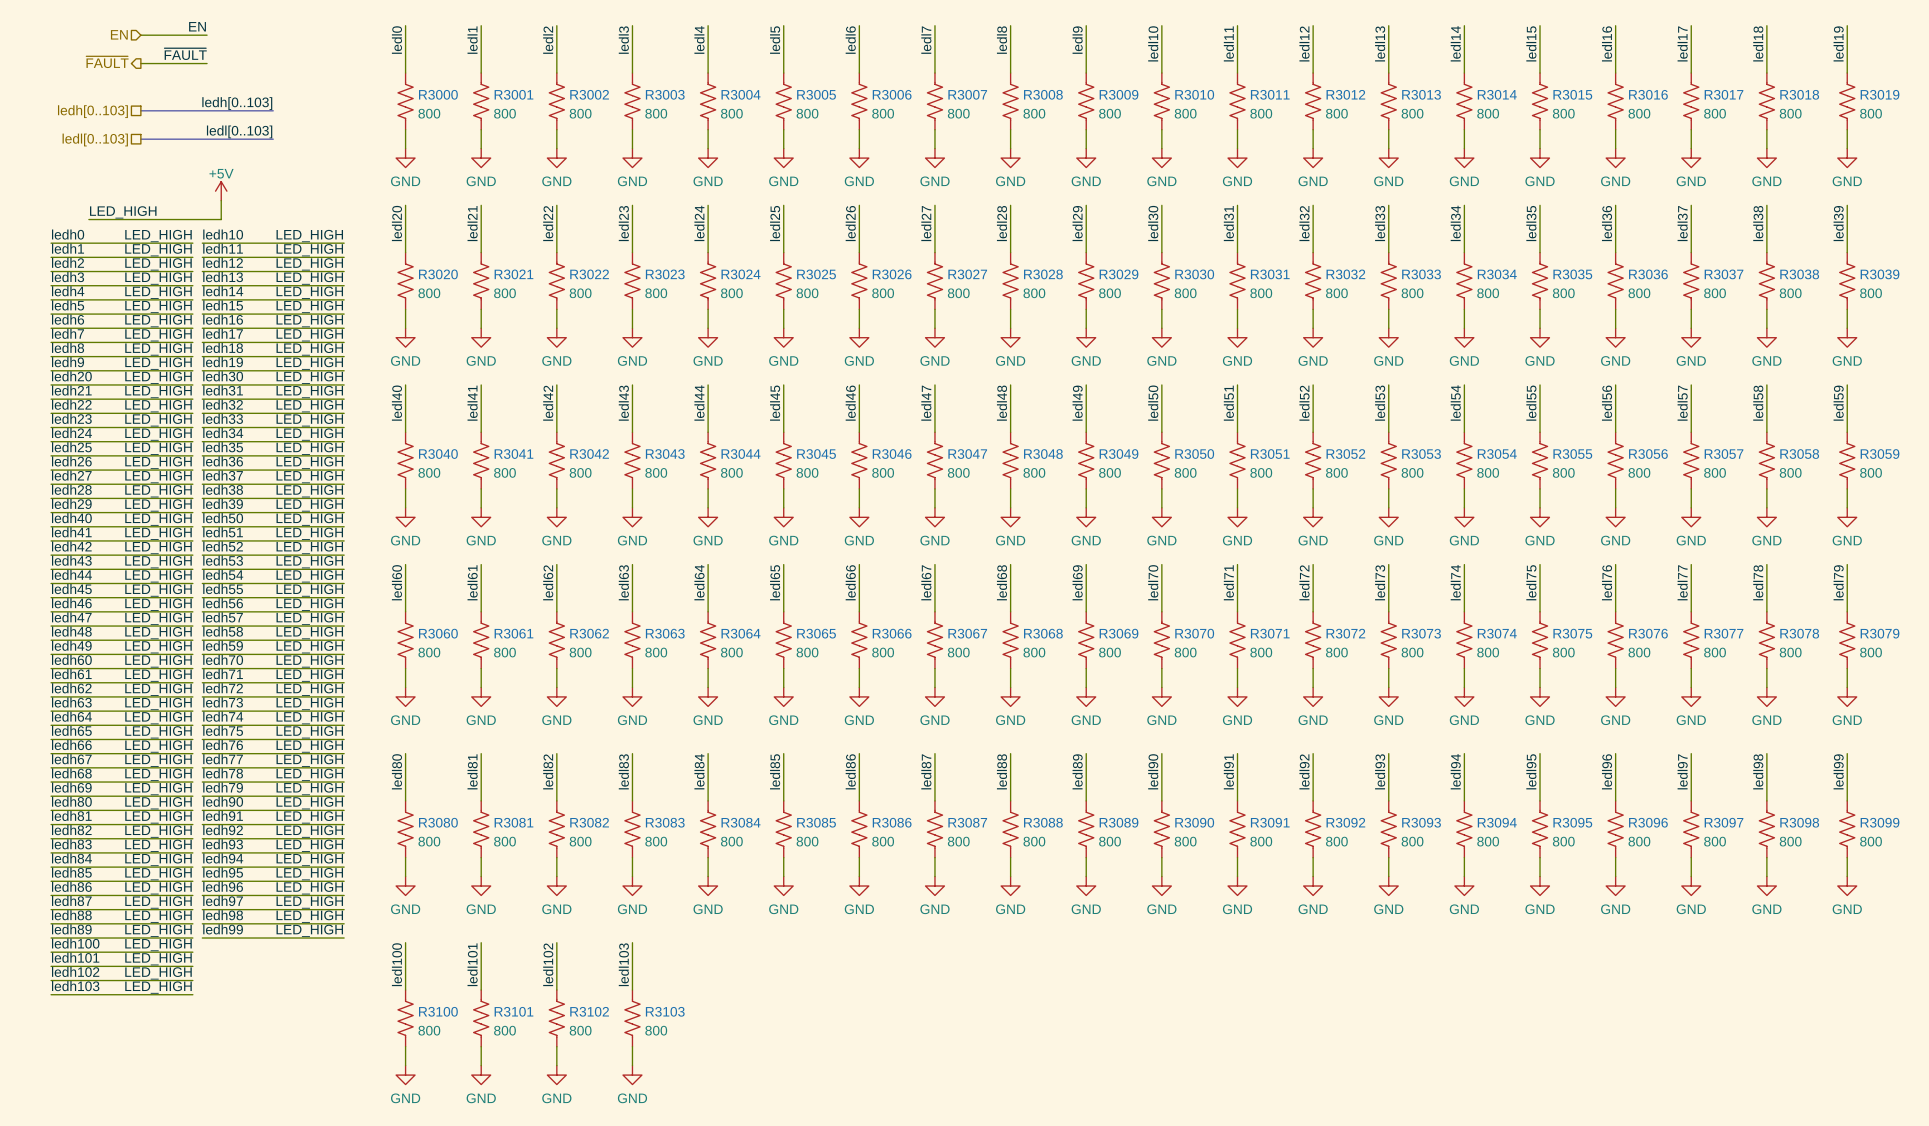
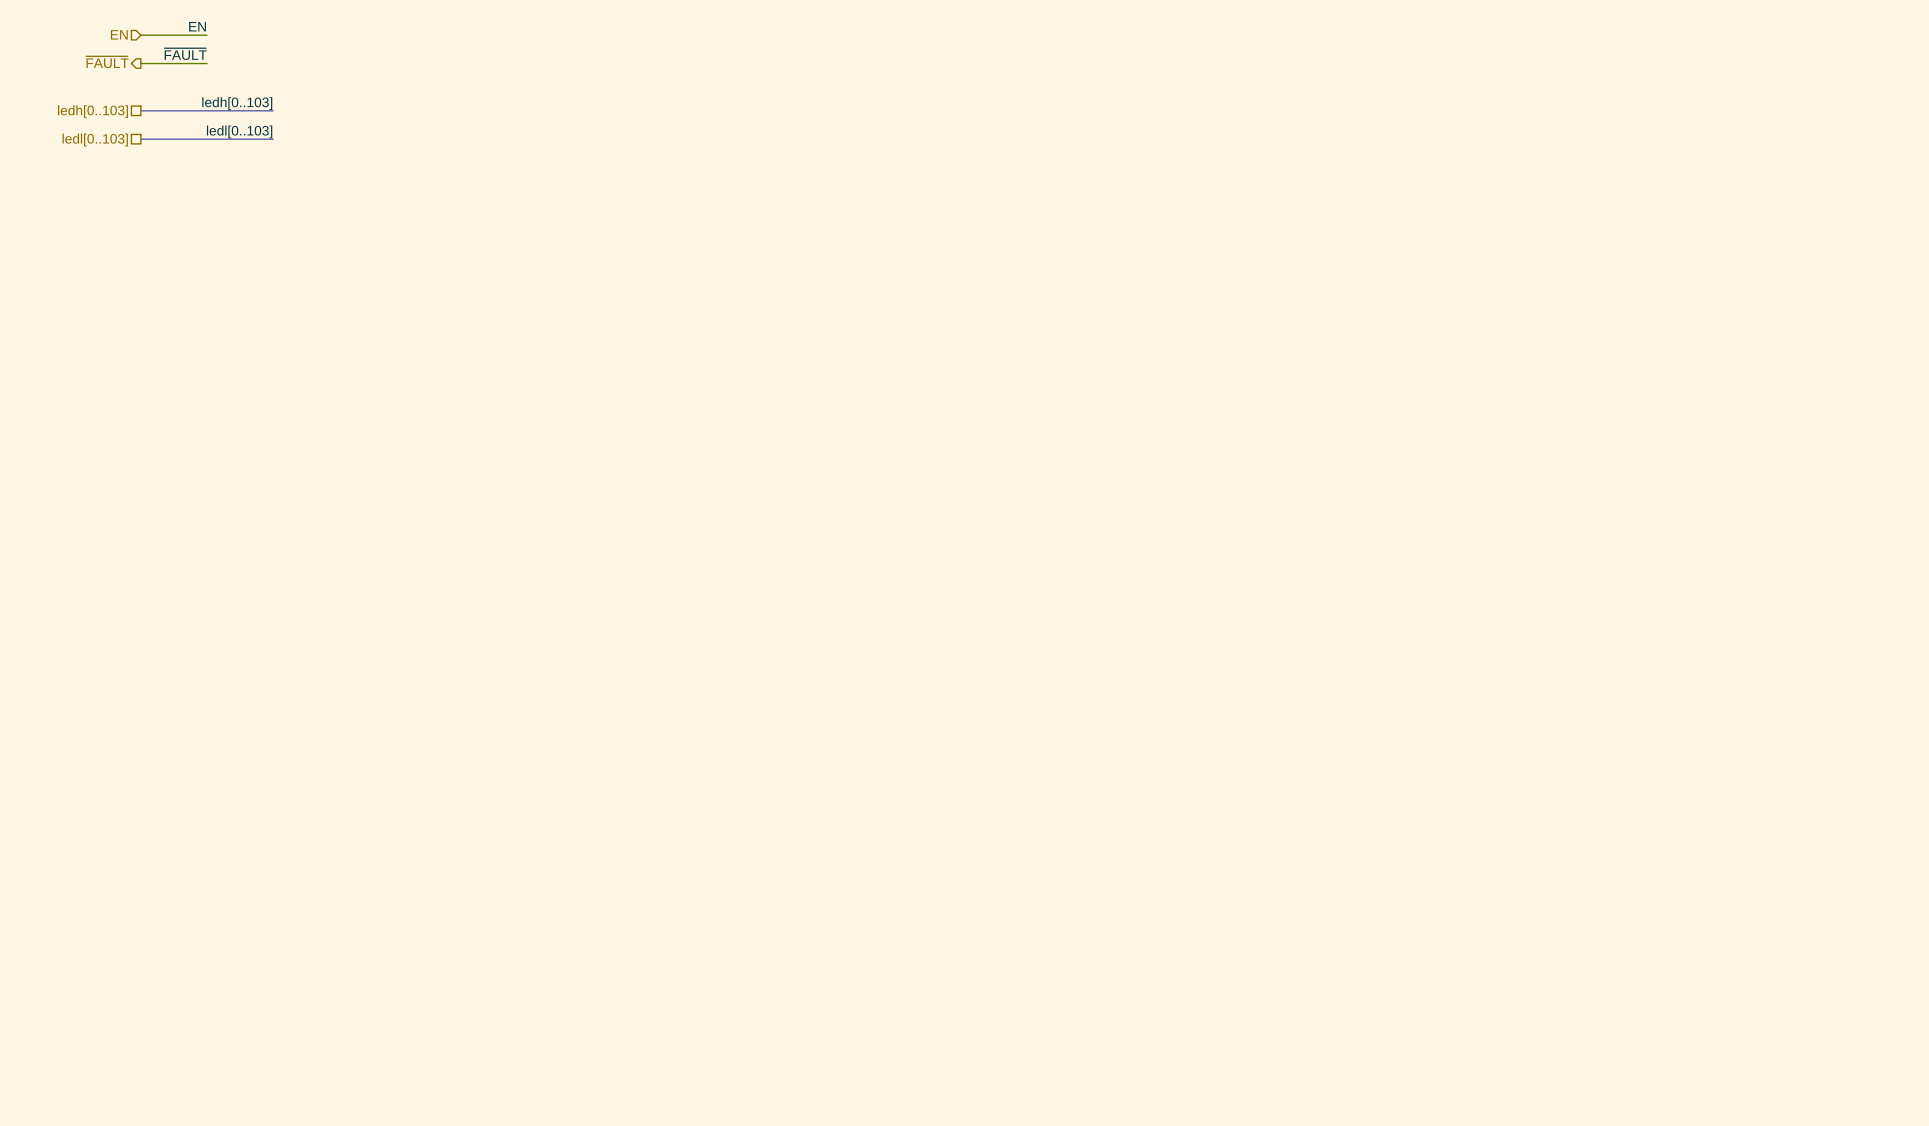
wire: (405, 25) (405, 73) -> none
wire: (481, 25) (481, 73) -> none
wire: (556, 25) (556, 73) -> none
wire: (632, 25) (632, 73) -> none
wire: (708, 25) (708, 73) -> none
wire: (783, 25) (783, 73) -> none
wire: (859, 25) (859, 73) -> none
wire: (934, 25) (934, 73) -> none
wire: (1010, 25) (1010, 73) -> none
wire: (1086, 25) (1086, 73) -> none
wire: (1161, 25) (1161, 73) -> none
wire: (1237, 25) (1237, 73) -> none
wire: (1313, 25) (1313, 73) -> none
wire: (1388, 25) (1388, 73) -> none
wire: (1464, 25) (1464, 73) -> none
wire: (1540, 25) (1540, 73) -> none
wire: (1615, 25) (1615, 73) -> none
wire: (1691, 25) (1691, 73) -> none
wire: (1766, 25) (1766, 73) -> none
wire: (1847, 25) (1847, 73) -> none
label: ledl4 (699, 39) -> none
label: ledl0 (396, 40) -> none
label: ledl1 (472, 40) -> none
label: ledl2 (548, 40) -> none
label: ledl3 (623, 40) -> none
label: ledl5 (775, 40) -> none
label: ledl6 (850, 40) -> none
label: ledl7 (926, 40) -> none
label: ledl8 (1001, 40) -> none
label: ledl9 (1077, 40) -> none
label: ledl10 (1153, 43) -> none
label: ledl11 (1228, 43) -> none
label: ledl12 (1304, 43) -> none
label: ledl13 (1380, 43) -> none
label: ledl14 (1455, 43) -> none
label: ledl15 (1531, 43) -> none
label: ledl16 (1607, 43) -> none
label: ledl17 (1682, 43) -> none
label: ledl18 (1758, 43) -> none
label: ledl19 (1838, 43) -> none
R3000: 800 (405, 101) -> none
R3001: 800 (481, 101) -> none
R3002: 800 (556, 101) -> none
R3003: 800 (632, 101) -> none
R3004: 800 (708, 101) -> none
R3005: 800 (783, 101) -> none
R3006: 800 (859, 101) -> none
R3007: 800 (934, 101) -> none
R3008: 800 (1010, 101) -> none
R3009: 800 (1086, 101) -> none
R3010: 800 (1161, 101) -> none
R3011: 800 (1237, 101) -> none
R3012: 800 (1313, 101) -> none
R3013: 800 (1388, 101) -> none
R3014: 800 (1464, 101) -> none
R3015: 800 (1540, 101) -> none
R3016: 800 (1615, 101) -> none
R3017: 800 (1691, 101) -> none
R3018: 800 (1766, 101) -> none
R3019: 800 (1847, 101) -> none
wire: (405, 129) (405, 148) -> none
wire: (481, 129) (481, 148) -> none
wire: (556, 129) (556, 148) -> none
wire: (632, 129) (632, 148) -> none
wire: (708, 129) (708, 148) -> none
wire: (783, 129) (783, 148) -> none
wire: (859, 129) (859, 148) -> none
wire: (934, 129) (934, 148) -> none
wire: (1010, 129) (1010, 148) -> none
wire: (1086, 129) (1086, 148) -> none
wire: (1161, 129) (1161, 148) -> none
wire: (1237, 129) (1237, 148) -> none
wire: (1313, 129) (1313, 148) -> none
wire: (1388, 129) (1388, 148) -> none
wire: (1464, 129) (1464, 148) -> none
wire: (1540, 129) (1540, 148) -> none
wire: (1615, 129) (1615, 148) -> none
wire: (1691, 129) (1691, 148) -> none
wire: (1766, 129) (1766, 148) -> none
wire: (1847, 129) (1847, 148) -> none
power symbol: GND (405, 158) -> none
power symbol: GND (481, 158) -> none
power symbol: GND (556, 158) -> none
power symbol: GND (632, 158) -> none
power symbol: GND (708, 158) -> none
power symbol: GND (783, 158) -> none
power symbol: GND (859, 158) -> none
power symbol: GND (934, 158) -> none
power symbol: GND (1010, 158) -> none
power symbol: GND (1086, 158) -> none
power symbol: GND (1161, 158) -> none
power symbol: GND (1237, 158) -> none
power symbol: GND (1313, 158) -> none
power symbol: GND (1388, 158) -> none
power symbol: GND (1464, 158) -> none
power symbol: GND (1540, 158) -> none
power symbol: GND (1615, 158) -> none
power symbol: GND (1691, 158) -> none
power symbol: GND (1766, 158) -> none
power symbol: GND (1847, 158) -> none
power symbol: +5V (221, 191) -> none
wire: (221, 200) (221, 219) (88, 219) -> none
wire: (405, 205) (405, 252) -> none
wire: (481, 205) (481, 252) -> none
wire: (556, 205) (556, 252) -> none
wire: (632, 205) (632, 252) -> none
wire: (708, 205) (708, 252) -> none
wire: (783, 205) (783, 252) -> none
wire: (859, 205) (859, 252) -> none
wire: (934, 205) (934, 252) -> none
wire: (1010, 205) (1010, 252) -> none
wire: (1086, 205) (1086, 252) -> none
wire: (1161, 205) (1161, 252) -> none
wire: (1237, 205) (1237, 252) -> none
wire: (1313, 205) (1313, 252) -> none
wire: (1388, 205) (1388, 252) -> none
wire: (1464, 205) (1464, 252) -> none
wire: (1540, 205) (1540, 252) -> none
wire: (1615, 205) (1615, 252) -> none
wire: (1691, 205) (1691, 252) -> none
wire: (1766, 205) (1766, 252) -> none
wire: (1847, 205) (1847, 252) -> none
label: LED_HIGH (123, 212) -> none
label: ledl20 (396, 223) -> none
label: ledl21 (472, 223) -> none
label: ledl22 (548, 223) -> none
label: ledl23 (623, 223) -> none
label: ledl24 (699, 223) -> none
label: ledl25 (775, 223) -> none
label: ledl26 (850, 223) -> none
label: ledl27 (926, 223) -> none
label: ledl28 (1001, 223) -> none
label: ledl29 (1077, 223) -> none
label: ledl30 (1153, 223) -> none
label: ledl31 (1228, 223) -> none
label: ledl32 (1304, 223) -> none
label: ledl33 (1380, 223) -> none
label: ledl34 (1455, 223) -> none
label: ledl35 (1531, 223) -> none
label: ledl36 (1607, 223) -> none
label: ledl37 (1682, 223) -> none
label: ledl38 (1758, 223) -> none
label: ledl39 (1838, 223) -> none
label: ledh0 (68, 234) -> none
label: ledh10 (223, 234) -> none
label: LED_HIGH (158, 236) -> none
label: LED_HIGH (309, 236) -> none
wire: (51, 243) (192, 243) -> none
wire: (202, 243) (344, 243) -> none
label: ledh1 (68, 248) -> none
label: ledh11 (223, 248) -> none
label: LED_HIGH (158, 250) -> none
label: LED_HIGH (309, 250) -> none
wire: (51, 257) (192, 257) -> none
wire: (202, 257) (344, 257) -> none
label: ledh2 (68, 262) -> none
label: ledh12 (223, 262) -> none
label: LED_HIGH (158, 264) -> none
label: LED_HIGH (309, 264) -> none
wire: (51, 271) (192, 271) -> none
wire: (202, 271) (344, 271) -> none
label: ledh3 (68, 277) -> none
label: ledh13 (223, 277) -> none
label: LED_HIGH (158, 278) -> none
label: LED_HIGH (309, 278) -> none
R3020: 800 (405, 280) -> none
R3021: 800 (481, 280) -> none
R3022: 800 (556, 280) -> none
R3023: 800 (632, 280) -> none
R3024: 800 (708, 280) -> none
R3025: 800 (783, 280) -> none
R3026: 800 (859, 280) -> none
R3027: 800 (934, 280) -> none
R3028: 800 (1010, 280) -> none
R3029: 800 (1086, 280) -> none
R3030: 800 (1161, 280) -> none
R3031: 800 (1237, 280) -> none
R3032: 800 (1313, 280) -> none
R3033: 800 (1388, 280) -> none
R3034: 800 (1464, 280) -> none
R3035: 800 (1540, 280) -> none
R3036: 800 (1615, 280) -> none
R3037: 800 (1691, 280) -> none
R3038: 800 (1766, 280) -> none
R3039: 800 (1847, 280) -> none
wire: (51, 285) (192, 285) -> none
wire: (202, 285) (344, 285) -> none
label: ledh4 (68, 291) -> none
label: ledh14 (223, 291) -> none
label: LED_HIGH (158, 292) -> none
label: LED_HIGH (309, 292) -> none
wire: (51, 299) (192, 299) -> none
wire: (202, 299) (344, 299) -> none
label: ledh5 (68, 305) -> none
label: ledh15 (223, 305) -> none
label: LED_HIGH (158, 306) -> none
label: LED_HIGH (309, 306) -> none
wire: (405, 309) (405, 328) -> none
wire: (481, 309) (481, 328) -> none
wire: (556, 309) (556, 328) -> none
wire: (632, 309) (632, 328) -> none
wire: (708, 309) (708, 328) -> none
wire: (783, 309) (783, 328) -> none
wire: (859, 309) (859, 328) -> none
wire: (934, 309) (934, 328) -> none
wire: (1010, 309) (1010, 328) -> none
wire: (1086, 309) (1086, 328) -> none
wire: (1161, 309) (1161, 328) -> none
wire: (1237, 309) (1237, 328) -> none
wire: (1313, 309) (1313, 328) -> none
wire: (1388, 309) (1388, 328) -> none
wire: (1464, 309) (1464, 328) -> none
wire: (1540, 309) (1540, 328) -> none
wire: (1615, 309) (1615, 328) -> none
wire: (1691, 309) (1691, 328) -> none
wire: (1766, 309) (1766, 328) -> none
wire: (1847, 309) (1847, 328) -> none
wire: (51, 314) (192, 314) -> none
wire: (202, 314) (344, 314) -> none
label: ledh6 (68, 319) -> none
label: ledh16 (223, 319) -> none
label: LED_HIGH (158, 321) -> none
label: LED_HIGH (309, 321) -> none
wire: (51, 328) (192, 328) -> none
wire: (202, 328) (344, 328) -> none
label: ledh7 (68, 333) -> none
label: ledh17 (223, 333) -> none
label: LED_HIGH (158, 335) -> none
label: LED_HIGH (309, 335) -> none
power symbol: GND (405, 337) -> none
power symbol: GND (481, 337) -> none
power symbol: GND (556, 337) -> none
power symbol: GND (632, 337) -> none
power symbol: GND (708, 337) -> none
power symbol: GND (783, 337) -> none
power symbol: GND (859, 337) -> none
power symbol: GND (934, 337) -> none
power symbol: GND (1010, 337) -> none
power symbol: GND (1086, 337) -> none
power symbol: GND (1161, 337) -> none
power symbol: GND (1237, 337) -> none
power symbol: GND (1313, 337) -> none
power symbol: GND (1388, 337) -> none
power symbol: GND (1464, 337) -> none
power symbol: GND (1540, 337) -> none
power symbol: GND (1615, 337) -> none
power symbol: GND (1691, 337) -> none
power symbol: GND (1766, 337) -> none
power symbol: GND (1847, 337) -> none
wire: (51, 342) (192, 342) -> none
wire: (202, 342) (344, 342) -> none
label: ledh8 (68, 347) -> none
label: ledh18 (223, 347) -> none
label: LED_HIGH (158, 349) -> none
label: LED_HIGH (309, 349) -> none
wire: (51, 356) (192, 356) -> none
wire: (202, 356) (344, 356) -> none
label: ledh9 (68, 362) -> none
label: ledh19 (223, 362) -> none
label: LED_HIGH (158, 363) -> none
label: LED_HIGH (309, 363) -> none
wire: (51, 370) (192, 370) -> none
wire: (202, 370) (344, 370) -> none
label: ledh20 (71, 376) -> none
label: ledh30 (223, 376) -> none
label: LED_HIGH (158, 377) -> none
label: LED_HIGH (309, 377) -> none
wire: (51, 384) (192, 384) -> none
wire: (202, 384) (344, 384) -> none
wire: (405, 384) (405, 432) -> none
wire: (481, 384) (481, 432) -> none
wire: (556, 384) (556, 432) -> none
wire: (632, 384) (632, 432) -> none
wire: (708, 384) (708, 432) -> none
wire: (783, 384) (783, 432) -> none
wire: (859, 384) (859, 432) -> none
wire: (934, 384) (934, 432) -> none
wire: (1010, 384) (1010, 432) -> none
wire: (1086, 384) (1086, 432) -> none
wire: (1161, 384) (1161, 432) -> none
wire: (1237, 384) (1237, 432) -> none
wire: (1313, 384) (1313, 432) -> none
wire: (1388, 384) (1388, 432) -> none
wire: (1464, 384) (1464, 432) -> none
wire: (1540, 384) (1540, 432) -> none
wire: (1615, 384) (1615, 432) -> none
wire: (1691, 384) (1691, 432) -> none
wire: (1766, 384) (1766, 432) -> none
wire: (1847, 384) (1847, 432) -> none
label: ledh21 (71, 390) -> none
label: ledh31 (223, 390) -> none
label: LED_HIGH (158, 392) -> none
label: LED_HIGH (309, 392) -> none
wire: (51, 399) (192, 399) -> none
wire: (202, 399) (344, 399) -> none
label: ledl40 (396, 403) -> none
label: ledl41 (472, 403) -> none
label: ledl42 (548, 403) -> none
label: ledl43 (623, 403) -> none
label: ledl44 (699, 403) -> none
label: ledl45 (775, 403) -> none
label: ledl46 (850, 403) -> none
label: ledl47 (926, 403) -> none
label: ledl48 (1001, 403) -> none
label: ledl49 (1077, 403) -> none
label: ledl50 (1153, 403) -> none
label: ledl51 (1228, 403) -> none
label: ledl52 (1304, 403) -> none
label: ledl53 (1380, 403) -> none
label: ledl54 (1455, 403) -> none
label: ledl55 (1531, 403) -> none
label: ledl56 (1607, 403) -> none
label: ledl57 (1682, 403) -> none
label: ledl58 (1758, 403) -> none
label: ledl59 (1838, 403) -> none
label: ledh22 (71, 404) -> none
label: ledh32 (223, 404) -> none
label: LED_HIGH (158, 406) -> none
label: LED_HIGH (309, 406) -> none
wire: (51, 413) (192, 413) -> none
wire: (202, 413) (344, 413) -> none
label: ledh23 (71, 418) -> none
label: ledh33 (223, 418) -> none
label: LED_HIGH (158, 420) -> none
label: LED_HIGH (309, 420) -> none
wire: (51, 427) (192, 427) -> none
wire: (202, 427) (344, 427) -> none
label: ledh24 (71, 433) -> none
label: ledh34 (223, 433) -> none
label: LED_HIGH (158, 434) -> none
label: LED_HIGH (309, 434) -> none
wire: (51, 441) (192, 441) -> none
wire: (202, 441) (344, 441) -> none
label: ledh25 (71, 447) -> none
label: ledh35 (223, 447) -> none
label: LED_HIGH (158, 448) -> none
label: LED_HIGH (309, 448) -> none
wire: (51, 455) (192, 455) -> none
wire: (202, 455) (344, 455) -> none
R3040: 800 (405, 460) -> none
R3041: 800 (481, 460) -> none
R3042: 800 (556, 460) -> none
R3043: 800 (632, 460) -> none
R3044: 800 (708, 460) -> none
R3045: 800 (783, 460) -> none
R3046: 800 (859, 460) -> none
R3047: 800 (934, 460) -> none
R3048: 800 (1010, 460) -> none
R3049: 800 (1086, 460) -> none
R3050: 800 (1161, 460) -> none
R3051: 800 (1237, 460) -> none
R3052: 800 (1313, 460) -> none
R3053: 800 (1388, 460) -> none
R3054: 800 (1464, 460) -> none
R3055: 800 (1540, 460) -> none
R3056: 800 (1615, 460) -> none
R3057: 800 (1691, 460) -> none
R3058: 800 (1766, 460) -> none
R3059: 800 (1847, 460) -> none
label: ledh26 (71, 461) -> none
label: ledh36 (223, 461) -> none
label: LED_HIGH (158, 462) -> none
label: LED_HIGH (309, 462) -> none
wire: (51, 470) (192, 470) -> none
wire: (202, 470) (344, 470) -> none
label: ledh27 (71, 475) -> none
label: ledh37 (223, 475) -> none
label: LED_HIGH (158, 477) -> none
label: LED_HIGH (309, 477) -> none
wire: (51, 484) (192, 484) -> none
wire: (202, 484) (344, 484) -> none
wire: (405, 488) (405, 507) -> none
wire: (481, 488) (481, 507) -> none
wire: (556, 488) (556, 507) -> none
wire: (632, 488) (632, 507) -> none
wire: (708, 488) (708, 507) -> none
wire: (783, 488) (783, 507) -> none
wire: (859, 488) (859, 507) -> none
wire: (934, 488) (934, 507) -> none
wire: (1010, 488) (1010, 507) -> none
wire: (1086, 488) (1086, 507) -> none
wire: (1161, 488) (1161, 507) -> none
wire: (1237, 488) (1237, 507) -> none
wire: (1313, 488) (1313, 507) -> none
wire: (1388, 488) (1388, 507) -> none
wire: (1464, 488) (1464, 507) -> none
wire: (1540, 488) (1540, 507) -> none
wire: (1615, 488) (1615, 507) -> none
wire: (1691, 488) (1691, 507) -> none
wire: (1766, 488) (1766, 507) -> none
wire: (1847, 488) (1847, 507) -> none
label: ledh28 (71, 489) -> none
label: ledh38 (223, 489) -> none
label: LED_HIGH (158, 491) -> none
label: LED_HIGH (309, 491) -> none
wire: (51, 498) (192, 498) -> none
wire: (202, 498) (344, 498) -> none
label: ledh29 (71, 503) -> none
label: ledh39 (223, 503) -> none
label: LED_HIGH (158, 505) -> none
label: LED_HIGH (309, 505) -> none
wire: (51, 512) (192, 512) -> none
wire: (202, 512) (344, 512) -> none
power symbol: GND (405, 517) -> none
power symbol: GND (481, 517) -> none
power symbol: GND (556, 517) -> none
power symbol: GND (632, 517) -> none
power symbol: GND (708, 517) -> none
power symbol: GND (783, 517) -> none
power symbol: GND (859, 517) -> none
power symbol: GND (934, 517) -> none
power symbol: GND (1010, 517) -> none
power symbol: GND (1086, 517) -> none
power symbol: GND (1161, 517) -> none
power symbol: GND (1237, 517) -> none
power symbol: GND (1313, 517) -> none
power symbol: GND (1388, 517) -> none
power symbol: GND (1464, 517) -> none
power symbol: GND (1540, 517) -> none
power symbol: GND (1615, 517) -> none
power symbol: GND (1691, 517) -> none
power symbol: GND (1766, 517) -> none
power symbol: GND (1847, 517) -> none
label: ledh40 (71, 518) -> none
label: ledh50 (223, 518) -> none
label: LED_HIGH (158, 519) -> none
label: LED_HIGH (309, 519) -> none
wire: (51, 526) (192, 526) -> none
wire: (202, 526) (344, 526) -> none
label: ledh41 (71, 532) -> none
label: ledh51 (223, 532) -> none
label: LED_HIGH (158, 533) -> none
label: LED_HIGH (309, 533) -> none
wire: (51, 540) (192, 540) -> none
wire: (202, 540) (344, 540) -> none
label: ledh42 (71, 546) -> none
label: ledh52 (223, 546) -> none
label: LED_HIGH (158, 547) -> none
label: LED_HIGH (309, 547) -> none
wire: (51, 555) (192, 555) -> none
wire: (202, 555) (344, 555) -> none
label: ledh43 (71, 560) -> none
label: ledh53 (223, 560) -> none
label: LED_HIGH (158, 562) -> none
label: LED_HIGH (309, 562) -> none
wire: (405, 564) (405, 611) -> none
wire: (481, 564) (481, 611) -> none
wire: (556, 564) (556, 611) -> none
wire: (632, 564) (632, 611) -> none
wire: (708, 564) (708, 611) -> none
wire: (783, 564) (783, 611) -> none
wire: (859, 564) (859, 611) -> none
wire: (934, 564) (934, 611) -> none
wire: (1010, 564) (1010, 611) -> none
wire: (1086, 564) (1086, 611) -> none
wire: (1161, 564) (1161, 611) -> none
wire: (1237, 564) (1237, 611) -> none
wire: (1313, 564) (1313, 611) -> none
wire: (1388, 564) (1388, 611) -> none
wire: (1464, 564) (1464, 611) -> none
wire: (1540, 564) (1540, 611) -> none
wire: (1615, 564) (1615, 611) -> none
wire: (1691, 564) (1691, 611) -> none
wire: (1766, 564) (1766, 611) -> none
wire: (1847, 564) (1847, 611) -> none
wire: (51, 569) (192, 569) -> none
wire: (202, 569) (344, 569) -> none
label: ledh44 (71, 574) -> none
label: ledh54 (223, 574) -> none
label: LED_HIGH (158, 576) -> none
label: LED_HIGH (309, 576) -> none
label: ledl60 (396, 582) -> none
label: ledl61 (472, 582) -> none
label: ledl62 (548, 582) -> none
label: ledl63 (623, 582) -> none
label: ledl64 (699, 582) -> none
label: ledl65 (775, 582) -> none
label: ledl66 (850, 582) -> none
label: ledl67 (926, 582) -> none
label: ledl68 (1001, 582) -> none
label: ledl69 (1077, 582) -> none
label: ledl70 (1153, 582) -> none
label: ledl71 (1228, 582) -> none
label: ledl72 (1304, 582) -> none
label: ledl73 (1380, 582) -> none
label: ledl74 (1455, 582) -> none
label: ledl75 (1531, 582) -> none
label: ledl76 (1607, 582) -> none
label: ledl77 (1682, 582) -> none
label: ledl78 (1758, 582) -> none
label: ledl79 (1838, 582) -> none
wire: (51, 583) (192, 583) -> none
wire: (202, 583) (344, 583) -> none
label: ledh45 (71, 589) -> none
label: ledh55 (223, 589) -> none
label: LED_HIGH (158, 590) -> none
label: LED_HIGH (309, 590) -> none
wire: (51, 597) (192, 597) -> none
wire: (202, 597) (344, 597) -> none
label: ledh46 (71, 603) -> none
label: ledh56 (223, 603) -> none
label: LED_HIGH (158, 604) -> none
label: LED_HIGH (309, 604) -> none
wire: (51, 611) (192, 611) -> none
wire: (202, 611) (344, 611) -> none
label: ledh47 (71, 617) -> none
label: ledh57 (223, 617) -> none
label: LED_HIGH (158, 618) -> none
label: LED_HIGH (309, 618) -> none
wire: (51, 626) (192, 626) -> none
wire: (202, 626) (344, 626) -> none
label: ledh48 (71, 631) -> none
label: ledh58 (223, 631) -> none
label: LED_HIGH (158, 633) -> none
label: LED_HIGH (309, 633) -> none
wire: (51, 640) (192, 640) -> none
wire: (202, 640) (344, 640) -> none
R3060: 800 (405, 640) -> none
R3061: 800 (481, 640) -> none
R3062: 800 (556, 640) -> none
R3063: 800 (632, 640) -> none
R3064: 800 (708, 640) -> none
R3065: 800 (783, 640) -> none
R3066: 800 (859, 640) -> none
R3067: 800 (934, 640) -> none
R3068: 800 (1010, 640) -> none
R3069: 800 (1086, 640) -> none
R3070: 800 (1161, 640) -> none
R3071: 800 (1237, 640) -> none
R3072: 800 (1313, 640) -> none
R3073: 800 (1388, 640) -> none
R3074: 800 (1464, 640) -> none
R3075: 800 (1540, 640) -> none
R3076: 800 (1615, 640) -> none
R3077: 800 (1691, 640) -> none
R3078: 800 (1766, 640) -> none
R3079: 800 (1847, 640) -> none
label: ledh49 (71, 645) -> none
label: ledh59 (223, 645) -> none
label: LED_HIGH (158, 647) -> none
label: LED_HIGH (309, 647) -> none
wire: (51, 654) (192, 654) -> none
wire: (202, 654) (344, 654) -> none
label: ledh60 (71, 659) -> none
label: ledh70 (223, 659) -> none
label: LED_HIGH (158, 661) -> none
label: LED_HIGH (309, 661) -> none
wire: (51, 668) (192, 668) -> none
wire: (202, 668) (344, 668) -> none
wire: (405, 668) (405, 687) -> none
wire: (481, 668) (481, 687) -> none
wire: (556, 668) (556, 687) -> none
wire: (632, 668) (632, 687) -> none
wire: (708, 668) (708, 687) -> none
wire: (783, 668) (783, 687) -> none
wire: (859, 668) (859, 687) -> none
wire: (934, 668) (934, 687) -> none
wire: (1010, 668) (1010, 687) -> none
wire: (1086, 668) (1086, 687) -> none
wire: (1161, 668) (1161, 687) -> none
wire: (1237, 668) (1237, 687) -> none
wire: (1313, 668) (1313, 687) -> none
wire: (1388, 668) (1388, 687) -> none
wire: (1464, 668) (1464, 687) -> none
wire: (1540, 668) (1540, 687) -> none
wire: (1615, 668) (1615, 687) -> none
wire: (1691, 668) (1691, 687) -> none
wire: (1766, 668) (1766, 687) -> none
wire: (1847, 668) (1847, 687) -> none
label: ledh61 (71, 674) -> none
label: ledh71 (223, 674) -> none
label: LED_HIGH (158, 675) -> none
label: LED_HIGH (309, 675) -> none
wire: (51, 682) (192, 682) -> none
wire: (202, 682) (344, 682) -> none
label: ledh62 (71, 688) -> none
label: ledh72 (223, 688) -> none
label: LED_HIGH (158, 689) -> none
label: LED_HIGH (309, 689) -> none
wire: (51, 696) (192, 696) -> none
wire: (202, 696) (344, 696) -> none
power symbol: GND (405, 696) -> none
power symbol: GND (481, 696) -> none
power symbol: GND (556, 696) -> none
power symbol: GND (632, 696) -> none
power symbol: GND (708, 696) -> none
power symbol: GND (783, 696) -> none
power symbol: GND (859, 696) -> none
power symbol: GND (934, 696) -> none
power symbol: GND (1010, 696) -> none
power symbol: GND (1086, 696) -> none
power symbol: GND (1161, 696) -> none
power symbol: GND (1237, 696) -> none
power symbol: GND (1313, 696) -> none
power symbol: GND (1388, 696) -> none
power symbol: GND (1464, 696) -> none
power symbol: GND (1540, 696) -> none
power symbol: GND (1615, 696) -> none
power symbol: GND (1691, 696) -> none
power symbol: GND (1766, 696) -> none
power symbol: GND (1847, 696) -> none
label: ledh63 (71, 702) -> none
label: ledh73 (223, 702) -> none
label: LED_HIGH (158, 703) -> none
label: LED_HIGH (309, 703) -> none
wire: (51, 711) (192, 711) -> none
wire: (202, 711) (344, 711) -> none
label: ledh64 (71, 716) -> none
label: ledh74 (223, 716) -> none
label: LED_HIGH (158, 718) -> none
label: LED_HIGH (309, 718) -> none
wire: (51, 725) (192, 725) -> none
wire: (202, 725) (344, 725) -> none
label: ledh65 (71, 730) -> none
label: ledh75 (223, 730) -> none
label: LED_HIGH (158, 732) -> none
label: LED_HIGH (309, 732) -> none
wire: (51, 739) (192, 739) -> none
wire: (202, 739) (344, 739) -> none
label: ledh66 (71, 745) -> none
label: ledh76 (223, 745) -> none
label: LED_HIGH (158, 746) -> none
label: LED_HIGH (309, 746) -> none
wire: (51, 753) (192, 753) -> none
wire: (202, 753) (344, 753) -> none
wire: (405, 753) (405, 800) -> none
wire: (481, 753) (481, 800) -> none
wire: (556, 753) (556, 800) -> none
wire: (632, 753) (632, 800) -> none
wire: (708, 753) (708, 800) -> none
wire: (783, 753) (783, 800) -> none
wire: (859, 753) (859, 800) -> none
wire: (934, 753) (934, 800) -> none
wire: (1010, 753) (1010, 800) -> none
wire: (1086, 753) (1086, 800) -> none
wire: (1161, 753) (1161, 800) -> none
wire: (1237, 753) (1237, 800) -> none
wire: (1313, 753) (1313, 800) -> none
wire: (1388, 753) (1388, 800) -> none
wire: (1464, 753) (1464, 800) -> none
wire: (1540, 753) (1540, 800) -> none
wire: (1615, 753) (1615, 800) -> none
wire: (1691, 753) (1691, 800) -> none
wire: (1766, 753) (1766, 800) -> none
wire: (1847, 753) (1847, 800) -> none
label: ledh67 (71, 759) -> none
label: ledh77 (223, 759) -> none
label: LED_HIGH (158, 760) -> none
label: LED_HIGH (309, 760) -> none
wire: (51, 767) (192, 767) -> none
wire: (202, 767) (344, 767) -> none
label: ledl80 (396, 771) -> none
label: ledl81 (472, 771) -> none
label: ledl82 (548, 771) -> none
label: ledl83 (623, 771) -> none
label: ledl84 (699, 771) -> none
label: ledl85 (775, 771) -> none
label: ledl86 (850, 771) -> none
label: ledl87 (926, 771) -> none
label: ledl88 (1001, 771) -> none
label: ledl89 (1077, 771) -> none
label: ledl90 (1153, 771) -> none
label: ledl91 (1228, 771) -> none
label: ledl92 (1304, 771) -> none
label: ledl93 (1380, 771) -> none
label: ledl94 (1455, 771) -> none
label: ledl95 (1531, 771) -> none
label: ledl96 (1607, 771) -> none
label: ledl97 (1682, 771) -> none
label: ledl98 (1758, 771) -> none
label: ledl99 (1838, 771) -> none
label: ledh68 (71, 773) -> none
label: ledh78 (223, 773) -> none
label: LED_HIGH (158, 774) -> none
label: LED_HIGH (309, 774) -> none
wire: (51, 782) (192, 782) -> none
wire: (202, 782) (344, 782) -> none
label: ledh69 (71, 787) -> none
label: ledh79 (223, 787) -> none
label: LED_HIGH (158, 789) -> none
label: LED_HIGH (309, 789) -> none
wire: (51, 796) (192, 796) -> none
wire: (202, 796) (344, 796) -> none
label: ledh80 (71, 801) -> none
label: ledh90 (223, 801) -> none
label: LED_HIGH (158, 803) -> none
label: LED_HIGH (309, 803) -> none
wire: (51, 810) (192, 810) -> none
wire: (202, 810) (344, 810) -> none
label: ledh81 (71, 815) -> none
label: ledh91 (223, 815) -> none
label: LED_HIGH (158, 817) -> none
label: LED_HIGH (309, 817) -> none
wire: (51, 824) (192, 824) -> none
wire: (202, 824) (344, 824) -> none
R3080: 800 (405, 829) -> none
R3081: 800 (481, 829) -> none
R3082: 800 (556, 829) -> none
R3083: 800 (632, 829) -> none
R3084: 800 (708, 829) -> none
R3085: 800 (783, 829) -> none
R3086: 800 (859, 829) -> none
R3087: 800 (934, 829) -> none
R3088: 800 (1010, 829) -> none
R3089: 800 (1086, 829) -> none
R3090: 800 (1161, 829) -> none
R3091: 800 (1237, 829) -> none
R3092: 800 (1313, 829) -> none
R3093: 800 (1388, 829) -> none
R3094: 800 (1464, 829) -> none
R3095: 800 (1540, 829) -> none
R3096: 800 (1615, 829) -> none
R3097: 800 (1691, 829) -> none
R3098: 800 (1766, 829) -> none
R3099: 800 (1847, 829) -> none
label: ledh82 (71, 830) -> none
label: ledh92 (223, 830) -> none
label: LED_HIGH (158, 831) -> none
label: LED_HIGH (309, 831) -> none
wire: (51, 838) (192, 838) -> none
wire: (202, 838) (344, 838) -> none
label: ledh83 (71, 844) -> none
label: ledh93 (223, 844) -> none
label: LED_HIGH (158, 845) -> none
label: LED_HIGH (309, 845) -> none
wire: (51, 852) (192, 852) -> none
wire: (202, 852) (344, 852) -> none
wire: (405, 857) (405, 876) -> none
wire: (481, 857) (481, 876) -> none
wire: (556, 857) (556, 876) -> none
wire: (632, 857) (632, 876) -> none
wire: (708, 857) (708, 876) -> none
wire: (783, 857) (783, 876) -> none
wire: (859, 857) (859, 876) -> none
wire: (934, 857) (934, 876) -> none
wire: (1010, 857) (1010, 876) -> none
wire: (1086, 857) (1086, 876) -> none
wire: (1161, 857) (1161, 876) -> none
wire: (1237, 857) (1237, 876) -> none
wire: (1313, 857) (1313, 876) -> none
wire: (1388, 857) (1388, 876) -> none
wire: (1464, 857) (1464, 876) -> none
wire: (1540, 857) (1540, 876) -> none
wire: (1615, 857) (1615, 876) -> none
wire: (1691, 857) (1691, 876) -> none
wire: (1766, 857) (1766, 876) -> none
wire: (1847, 857) (1847, 876) -> none
label: ledh84 (71, 858) -> none
label: ledh94 (223, 858) -> none
label: LED_HIGH (158, 859) -> none
label: LED_HIGH (309, 859) -> none
wire: (51, 867) (192, 867) -> none
wire: (202, 867) (344, 867) -> none
label: ledh85 (71, 872) -> none
label: ledh95 (223, 872) -> none
label: LED_HIGH (158, 874) -> none
label: LED_HIGH (309, 874) -> none
wire: (51, 881) (192, 881) -> none
wire: (202, 881) (344, 881) -> none
label: ledh86 (71, 886) -> none
label: ledh96 (223, 886) -> none
power symbol: GND (405, 886) -> none
power symbol: GND (481, 886) -> none
power symbol: GND (556, 886) -> none
power symbol: GND (632, 886) -> none
power symbol: GND (708, 886) -> none
power symbol: GND (783, 886) -> none
power symbol: GND (859, 886) -> none
power symbol: GND (934, 886) -> none
power symbol: GND (1010, 886) -> none
power symbol: GND (1086, 886) -> none
power symbol: GND (1161, 886) -> none
power symbol: GND (1237, 886) -> none
power symbol: GND (1313, 886) -> none
power symbol: GND (1388, 886) -> none
power symbol: GND (1464, 886) -> none
power symbol: GND (1540, 886) -> none
power symbol: GND (1615, 886) -> none
power symbol: GND (1691, 886) -> none
power symbol: GND (1766, 886) -> none
power symbol: GND (1847, 886) -> none
label: LED_HIGH (158, 888) -> none
label: LED_HIGH (309, 888) -> none
wire: (51, 895) (192, 895) -> none
wire: (202, 895) (344, 895) -> none
label: ledh87 (71, 901) -> none
label: ledh97 (223, 901) -> none
label: LED_HIGH (158, 902) -> none
label: LED_HIGH (309, 902) -> none
wire: (51, 909) (192, 909) -> none
wire: (202, 909) (344, 909) -> none
label: ledh88 (71, 915) -> none
label: ledh98 (223, 915) -> none
label: LED_HIGH (158, 916) -> none
label: LED_HIGH (309, 916) -> none
wire: (51, 923) (192, 923) -> none
wire: (202, 923) (344, 923) -> none
label: ledh89 (71, 929) -> none
label: ledh99 (223, 929) -> none
label: LED_HIGH (158, 930) -> none
label: LED_HIGH (309, 930) -> none
wire: (51, 938) (192, 938) -> none
wire: (202, 938) (344, 938) -> none
wire: (405, 942) (405, 990) -> none
wire: (481, 942) (481, 990) -> none
wire: (556, 942) (556, 990) -> none
wire: (632, 942) (632, 990) -> none
label: ledh100 (75, 943) -> none
label: LED_HIGH (158, 945) -> none
wire: (51, 952) (192, 952) -> none
label: ledh101 (75, 957) -> none
label: LED_HIGH (158, 959) -> none
label: ledl100 (396, 964) -> none
label: ledl101 (472, 964) -> none
label: ledl102 (548, 964) -> none
label: ledl103 (623, 964) -> none
wire: (51, 966) (192, 966) -> none
label: ledh102 (75, 971) -> none
label: LED_HIGH (158, 973) -> none
wire: (51, 980) (192, 980) -> none
label: ledh103 (75, 986) -> none
label: LED_HIGH (158, 987) -> none
wire: (51, 994) (192, 994) -> none
R3100: 800 (405, 1018) -> none
R3101: 800 (481, 1018) -> none
R3102: 800 (556, 1018) -> none
R3103: 800 (632, 1018) -> none
wire: (405, 1046) (405, 1065) -> none
wire: (481, 1046) (481, 1065) -> none
wire: (556, 1046) (556, 1065) -> none
wire: (632, 1046) (632, 1065) -> none
power symbol: GND (405, 1075) -> none
power symbol: GND (481, 1075) -> none
power symbol: GND (556, 1075) -> none
power symbol: GND (632, 1075) -> none

